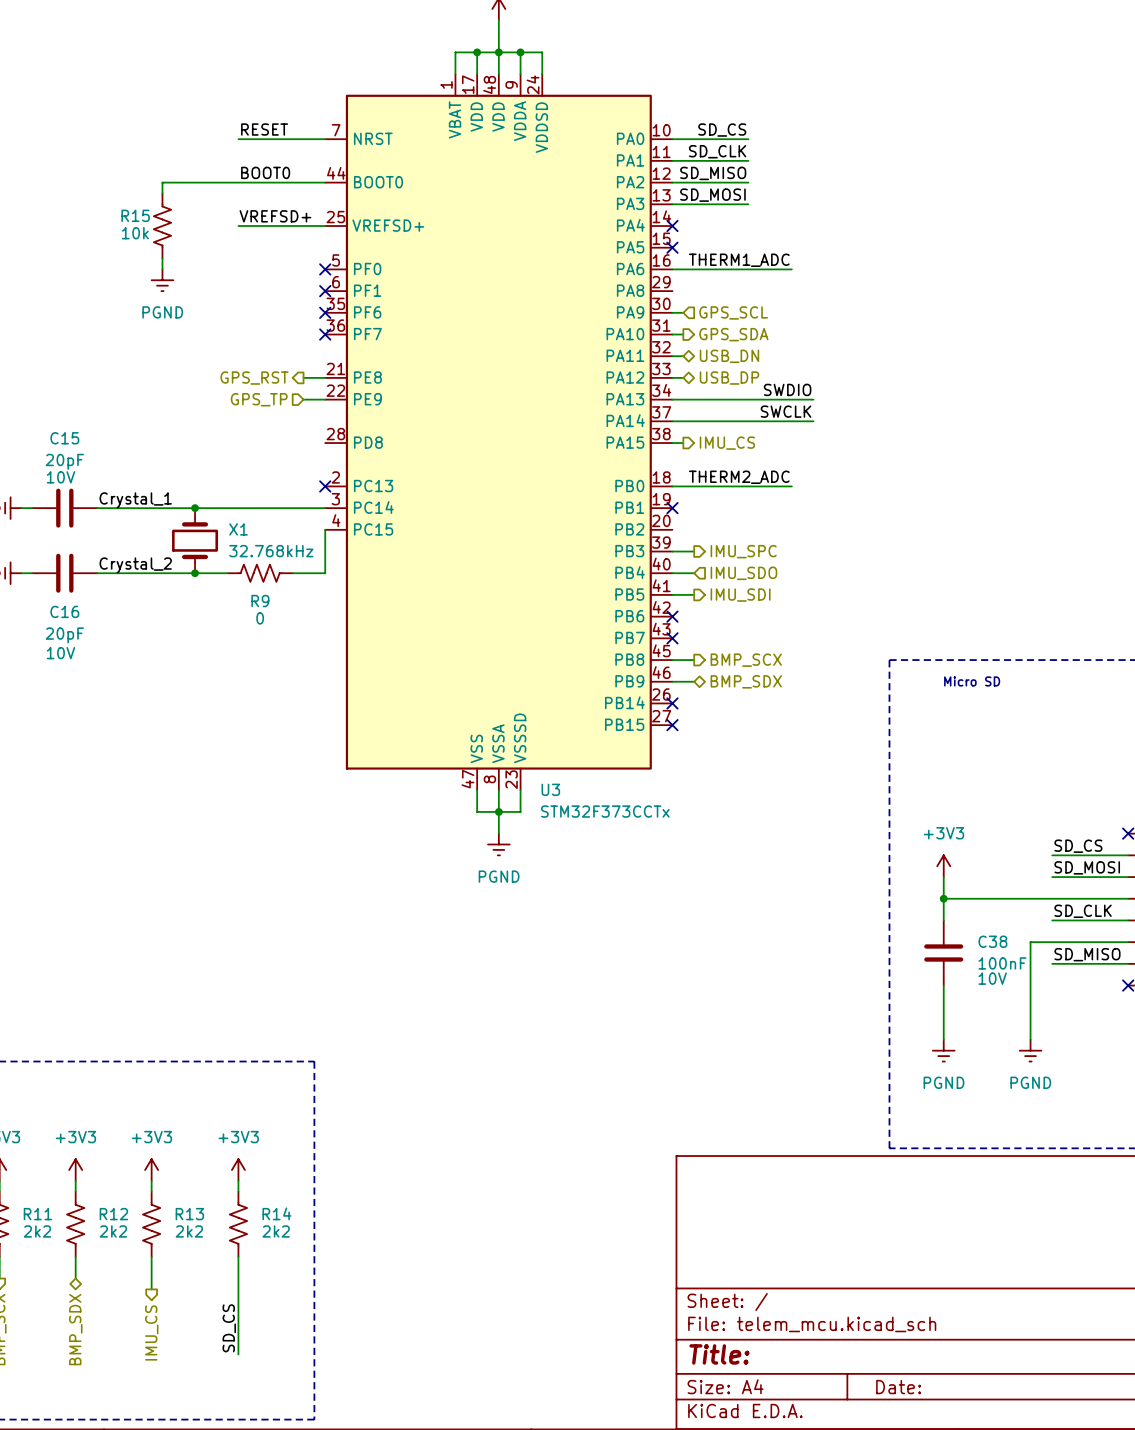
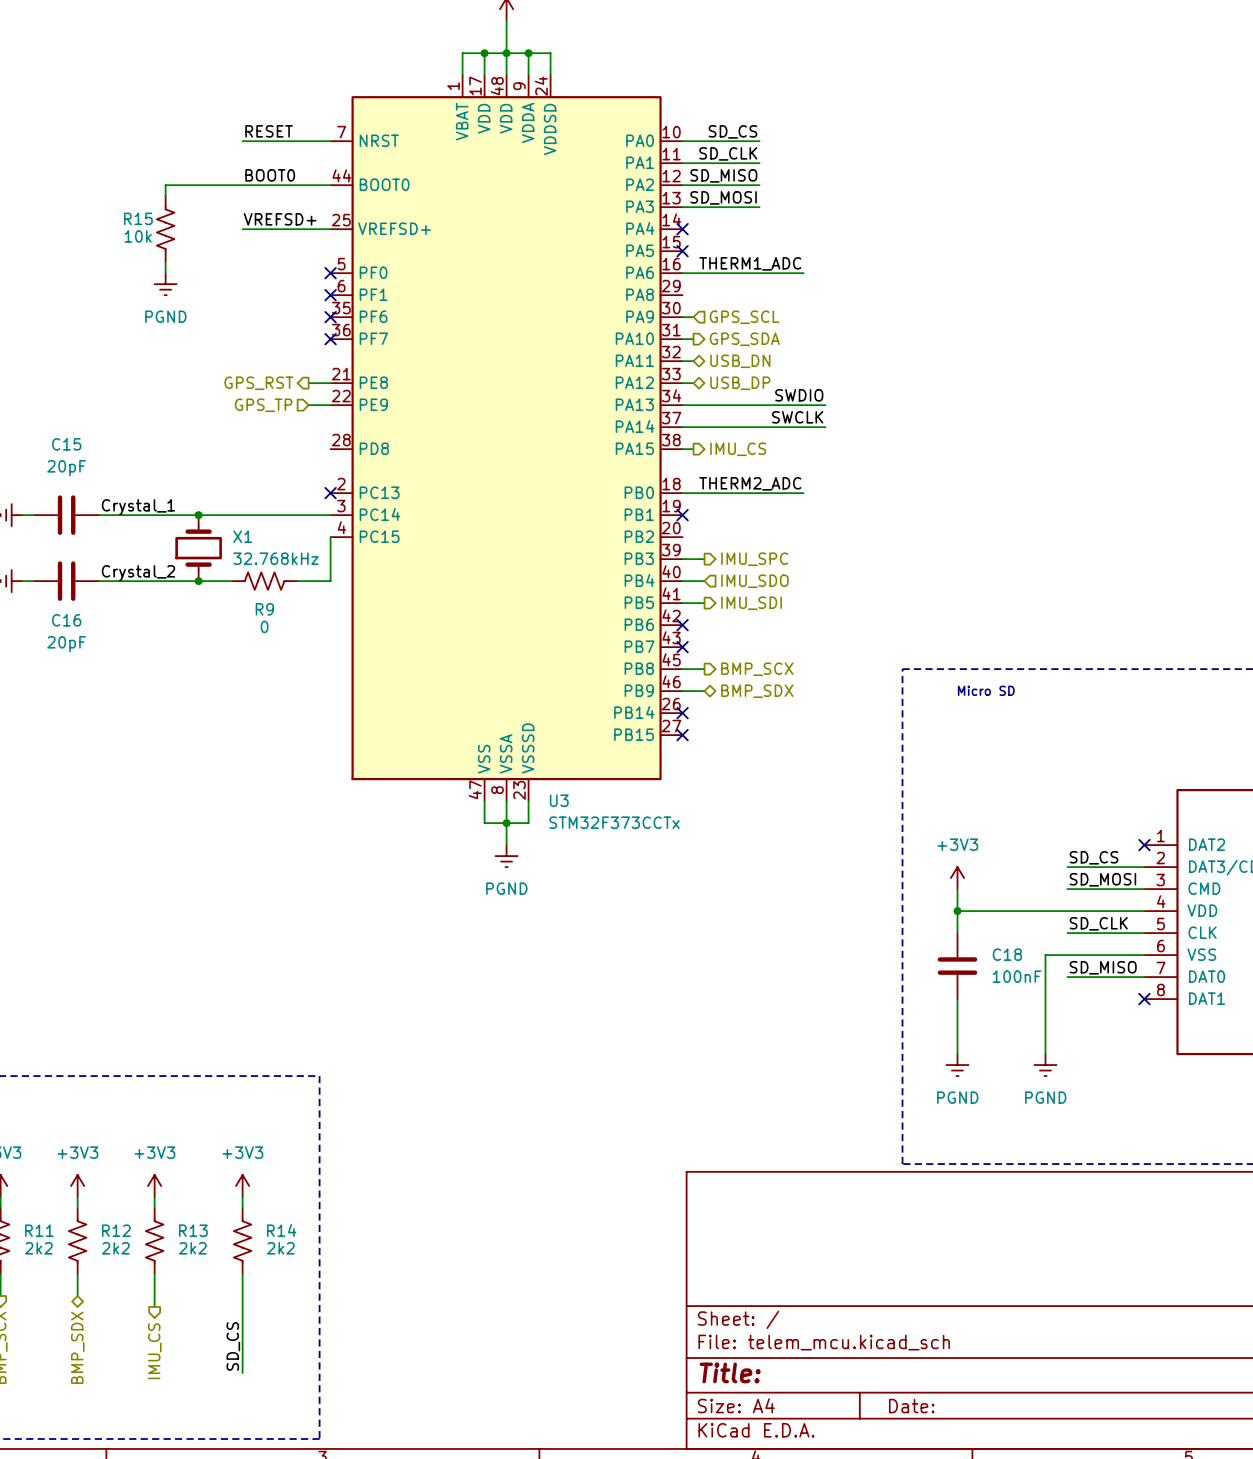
C15 text: 10V (60, 477) -> none
C16 text: 10V (60, 653) -> none
C38 name: C38 (992, 941) -> C18 (1007, 954)
C38 text: 10V (992, 978) -> none

